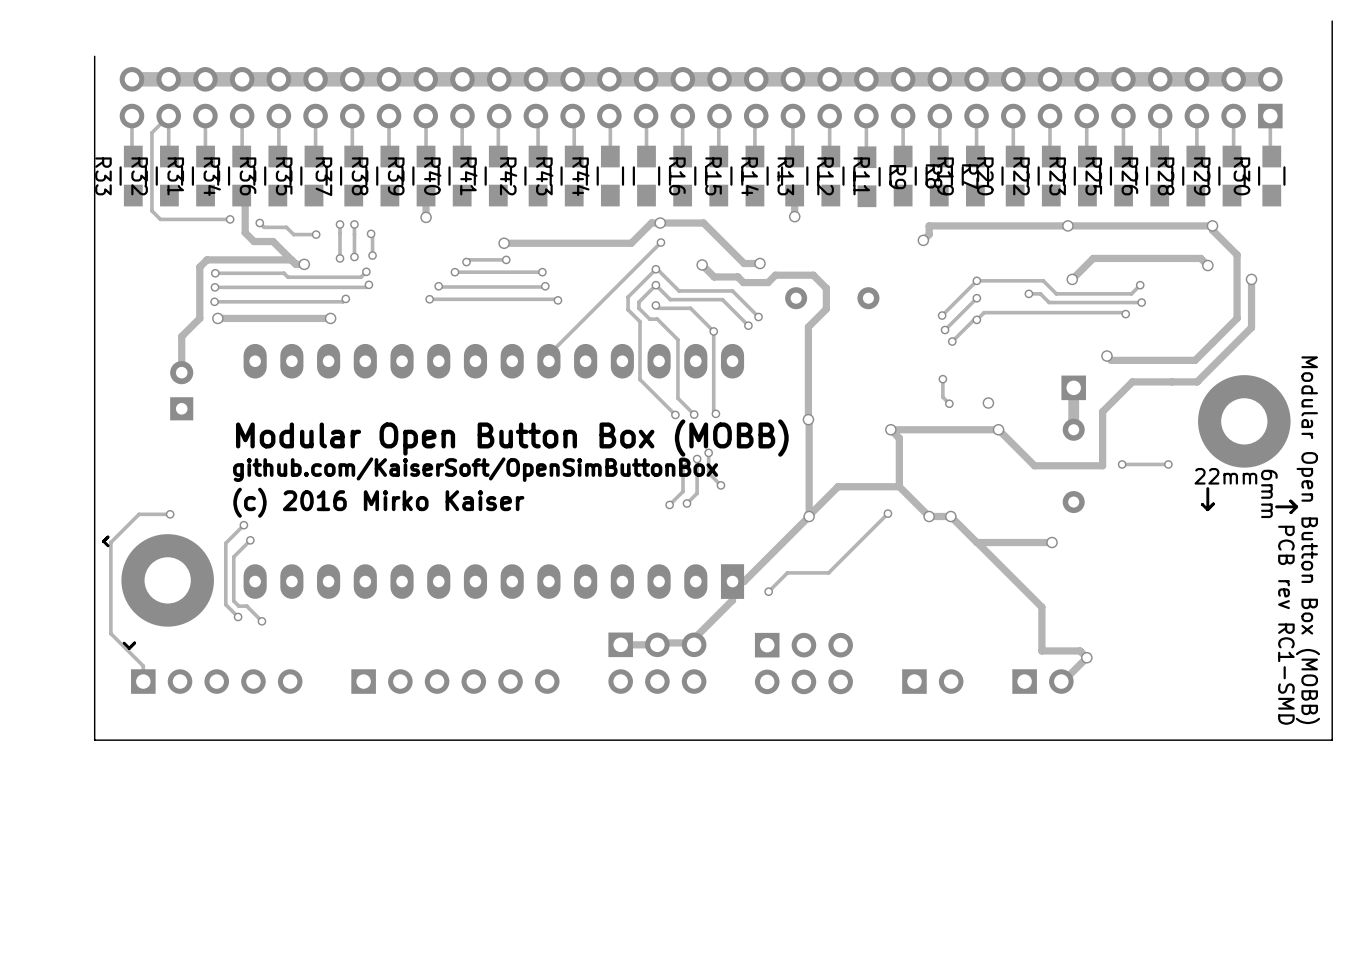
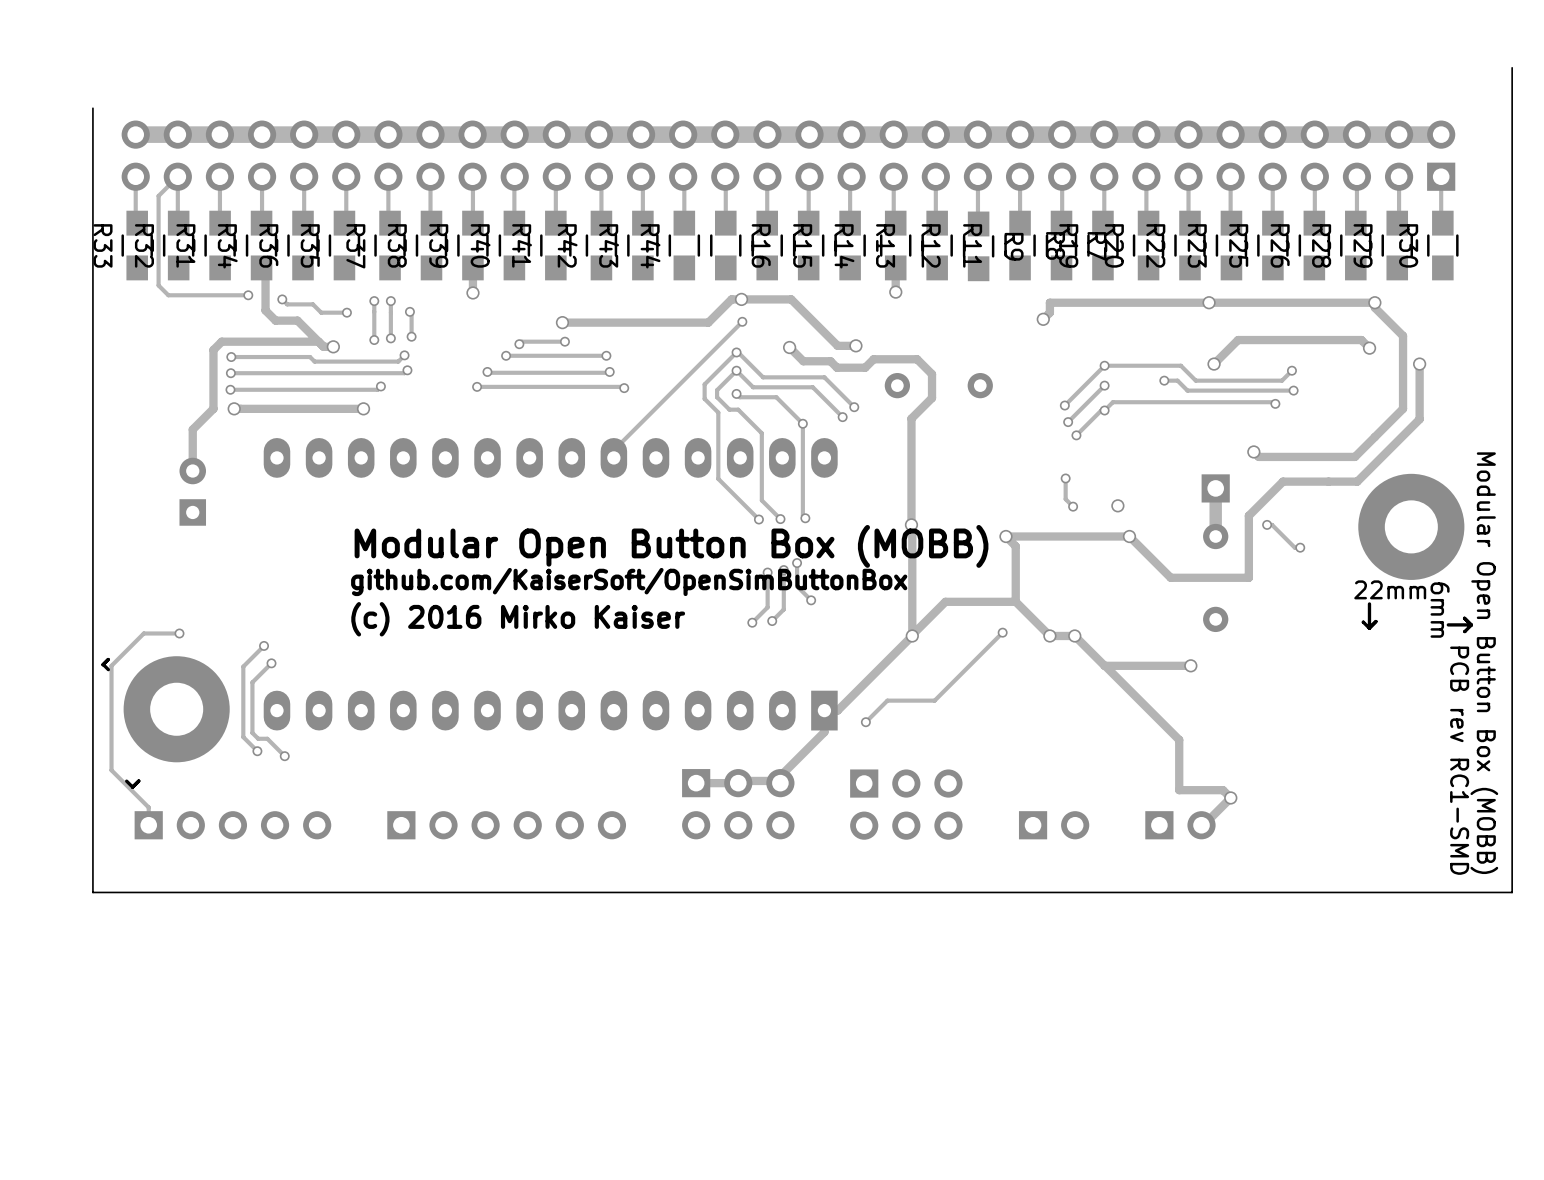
track: none -> (1267, 524) (1272, 524) (1294, 547) (1300, 547)
via: none -> (1267, 524)
text position: Modular Open Button Box (MOBB) (512, 438) -> Modular Open Button Box (MOBB) (671, 546)
via: none -> (1300, 547)
via: (1122, 464) -> none
track: (1168, 464) (1122, 464) -> none
via: (1168, 464) -> none
text position: github.com/KaiserSoft/OpenSimButtonBox (475, 469) -> github.com/KaiserSoft/OpenSimButtonBox (629, 581)
text position: (c) 2016 Mirko Kaiser (378, 502) -> (c) 2016 Mirko Kaiser (518, 619)

